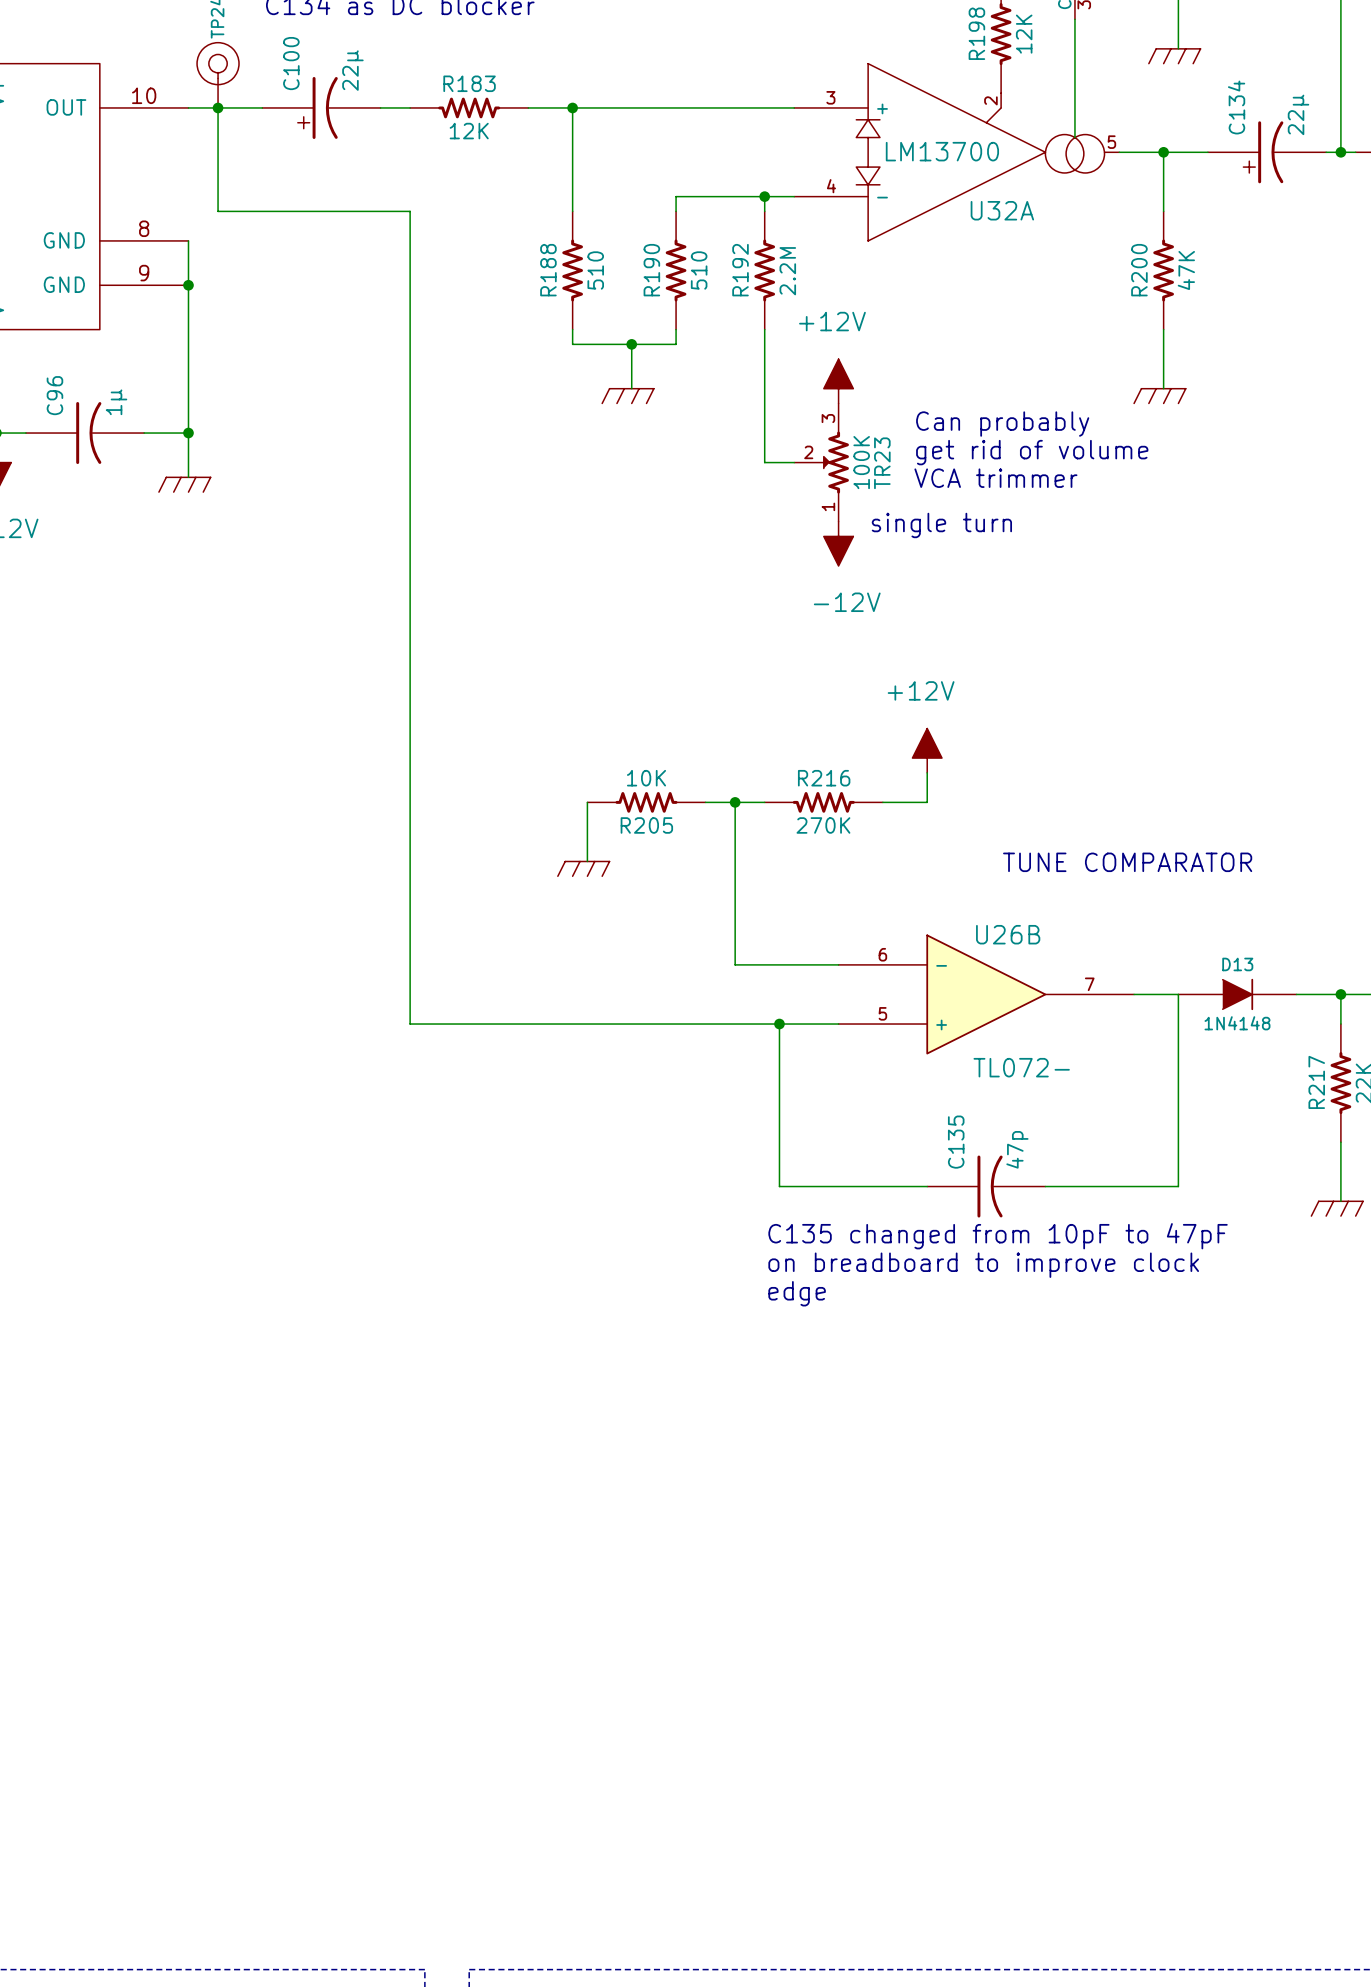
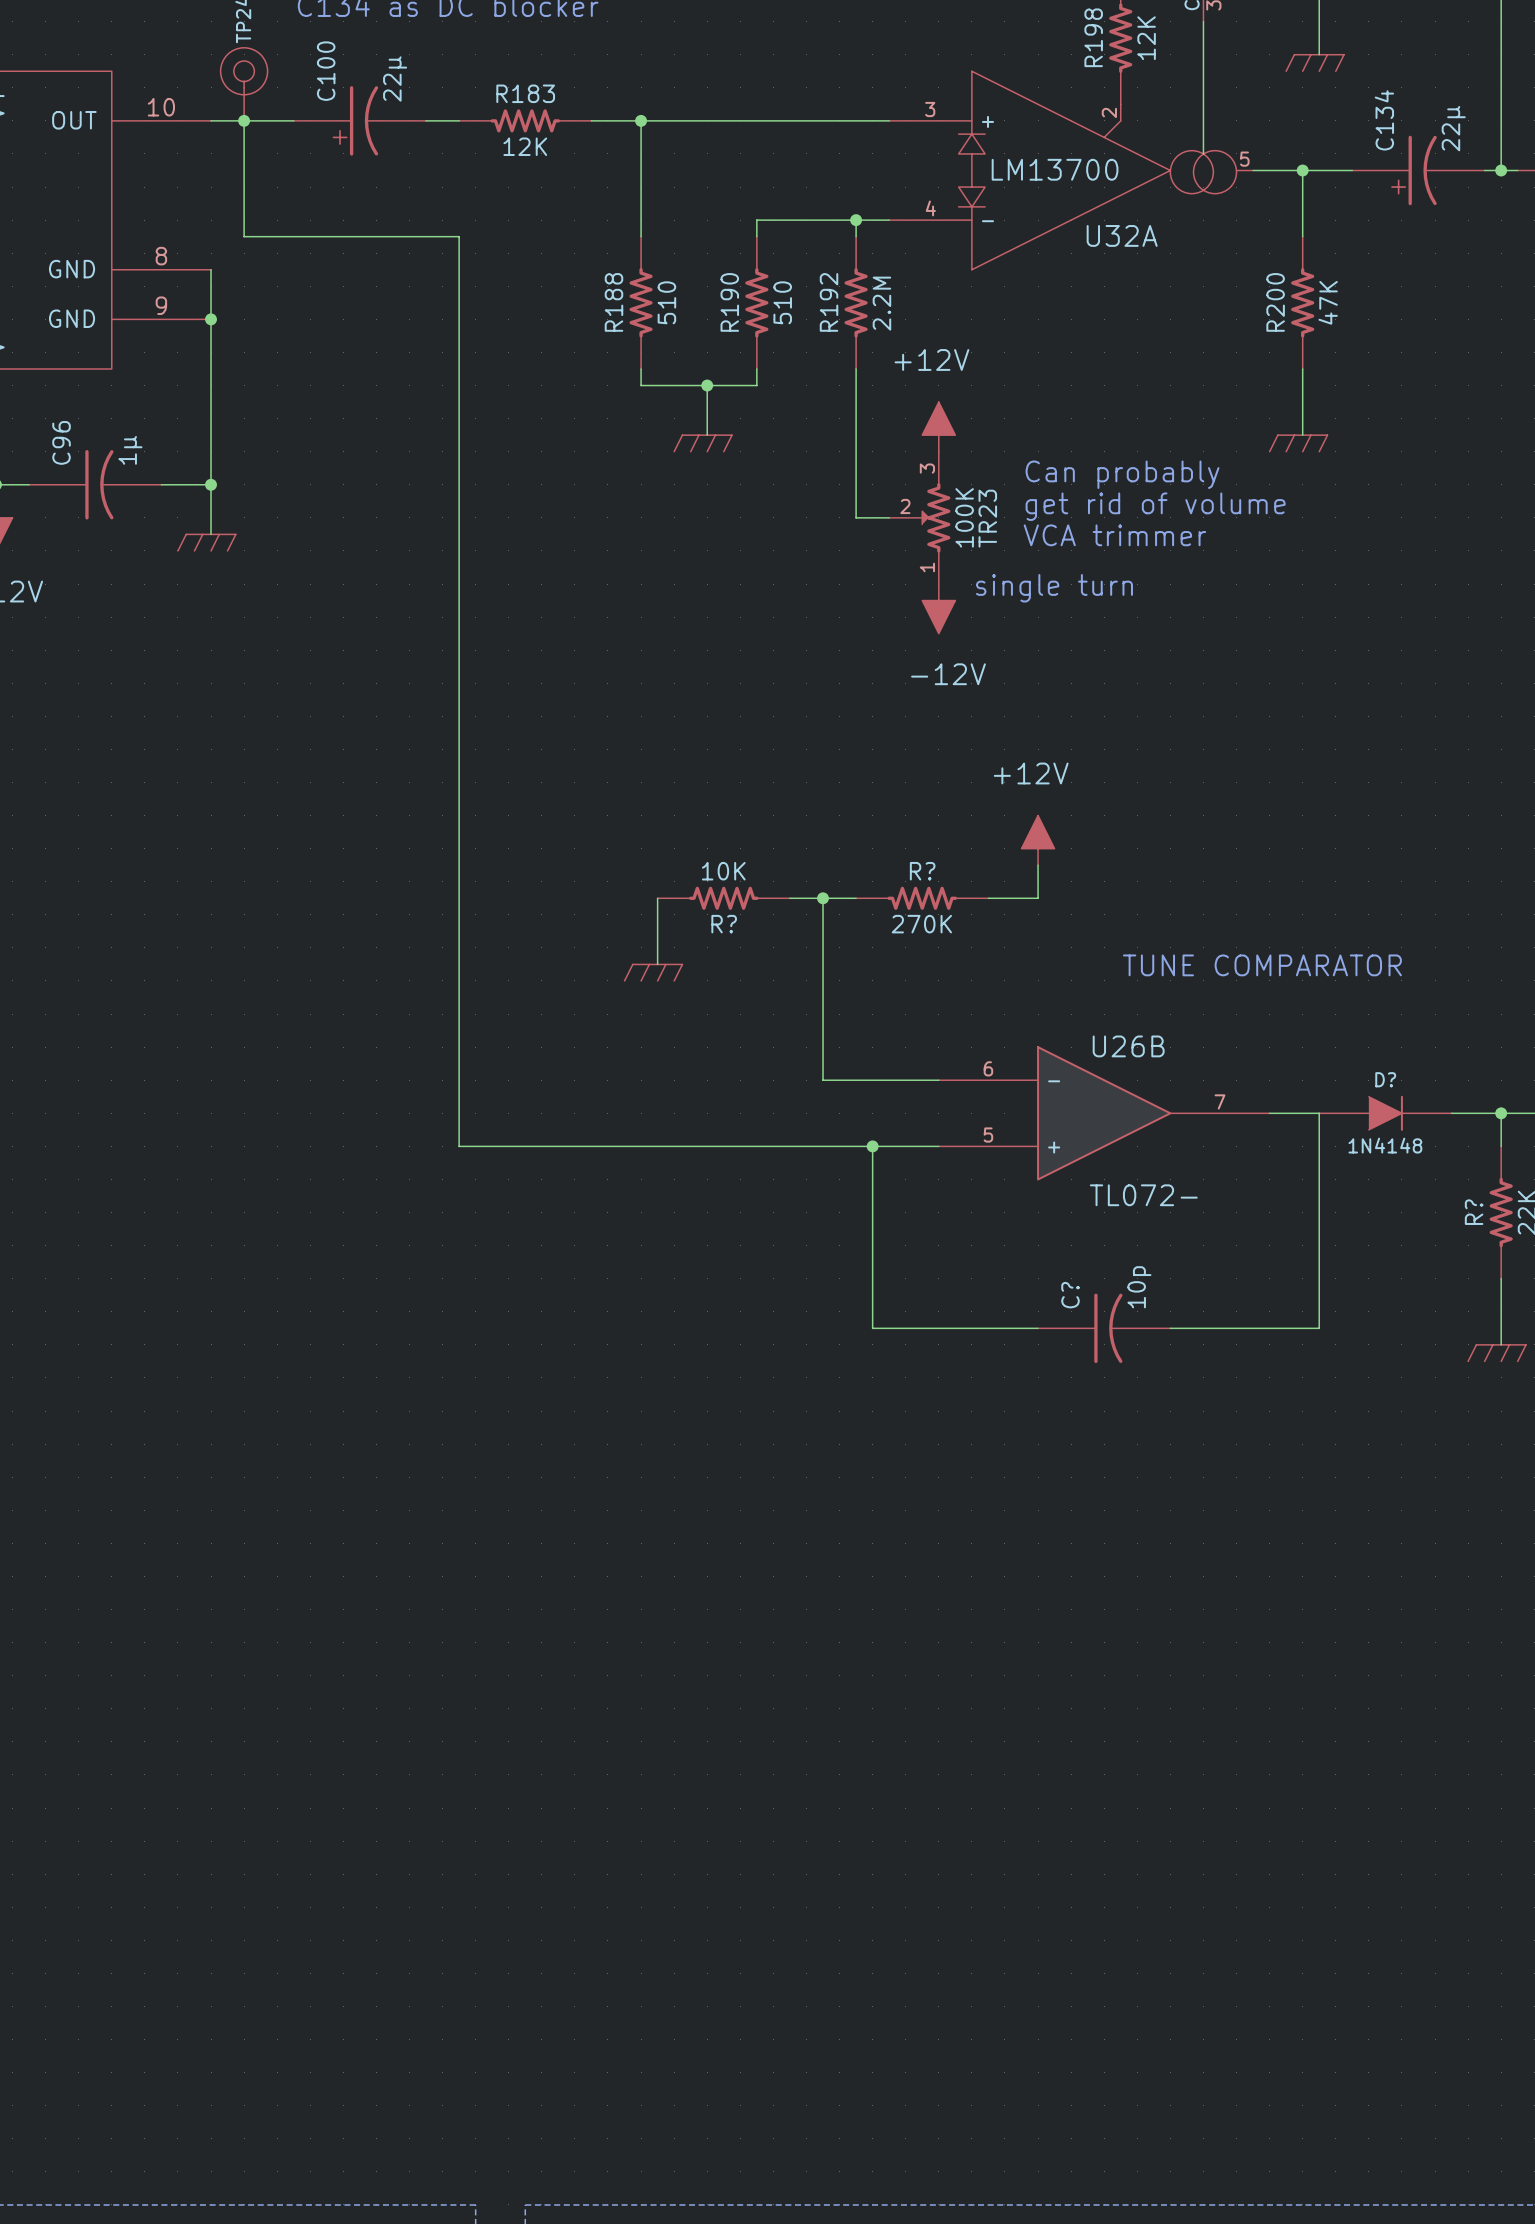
R216 name: R216 (824, 778) -> R? (922, 871)
R205 name: R205 (646, 825) -> R? (724, 924)
D13 name: D13 (1237, 964) -> D? (1385, 1079)
R217 name: R217 (1316, 1082) -> R? (1474, 1212)
C135 name: C135 (956, 1142) -> C? (1070, 1295)
C135 value: 47p (1017, 1149) -> 10p (1139, 1287)
text: C135 changed from 10pF to 47pF (998, 1236) -> none
text: on breadboard to improve clock (983, 1265) -> none
text: edge (797, 1293) -> none

